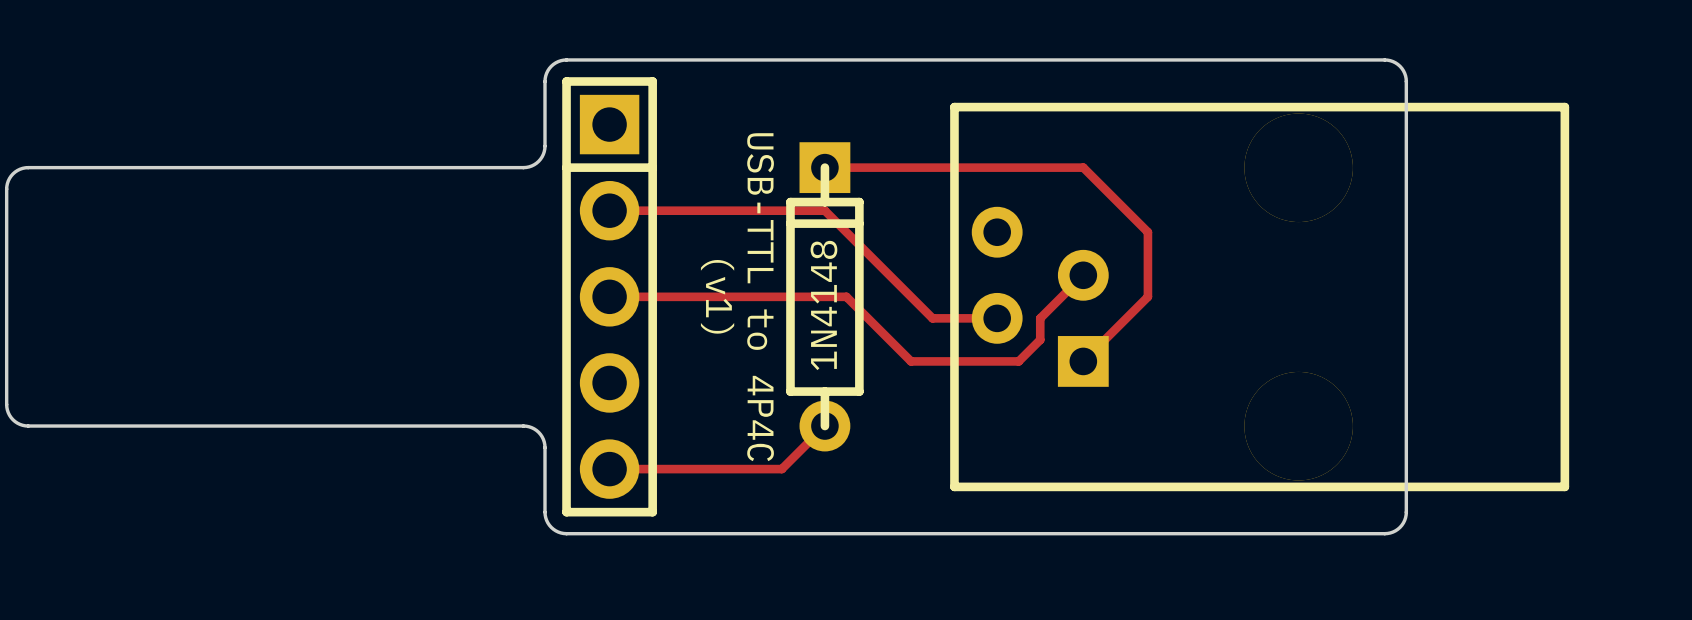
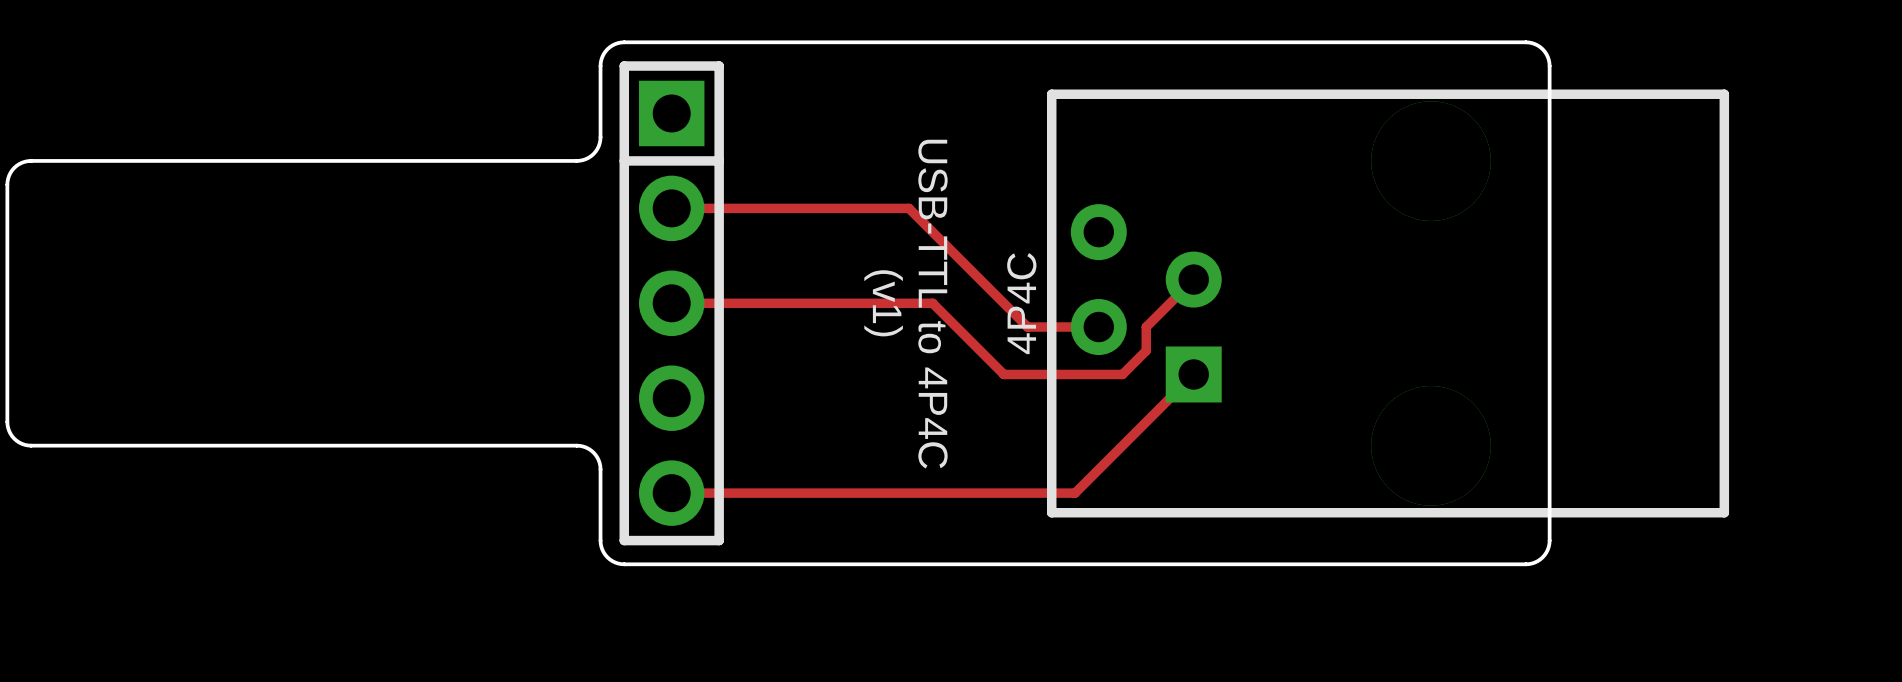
track: (824, 167) (1083, 167) (1147, 232) (1147, 296) (1083, 361) -> none
text position: (v1) (717, 296) -> (v1) (883, 303)
part: 1N4148 (824, 296) -> none
text position: USB-TTL to 4P4C (760, 297) -> USB-TTL to 4P4C (932, 304)
part value: none -> 4P4C (1021, 303)
track: (824, 426) (781, 469) -> (1193, 374) (1075, 493) (861, 493)

